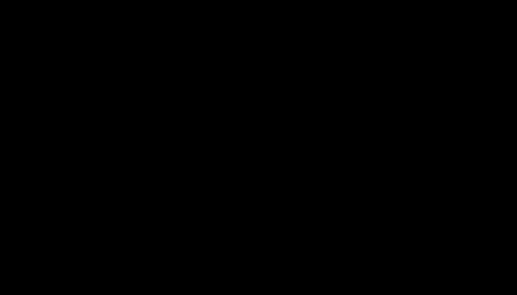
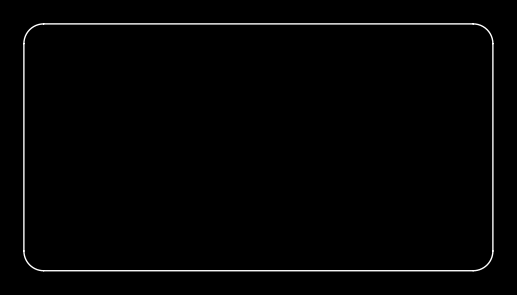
board edge: none -> (473, 23) (43, 23) (33, 26) (26, 33) (23, 43) (23, 250) (25, 259) (33, 267) (43, 270) (473, 270) (481, 268) (489, 261) (492, 250) (492, 43) (491, 36) (487, 29) (480, 25) (473, 23)

